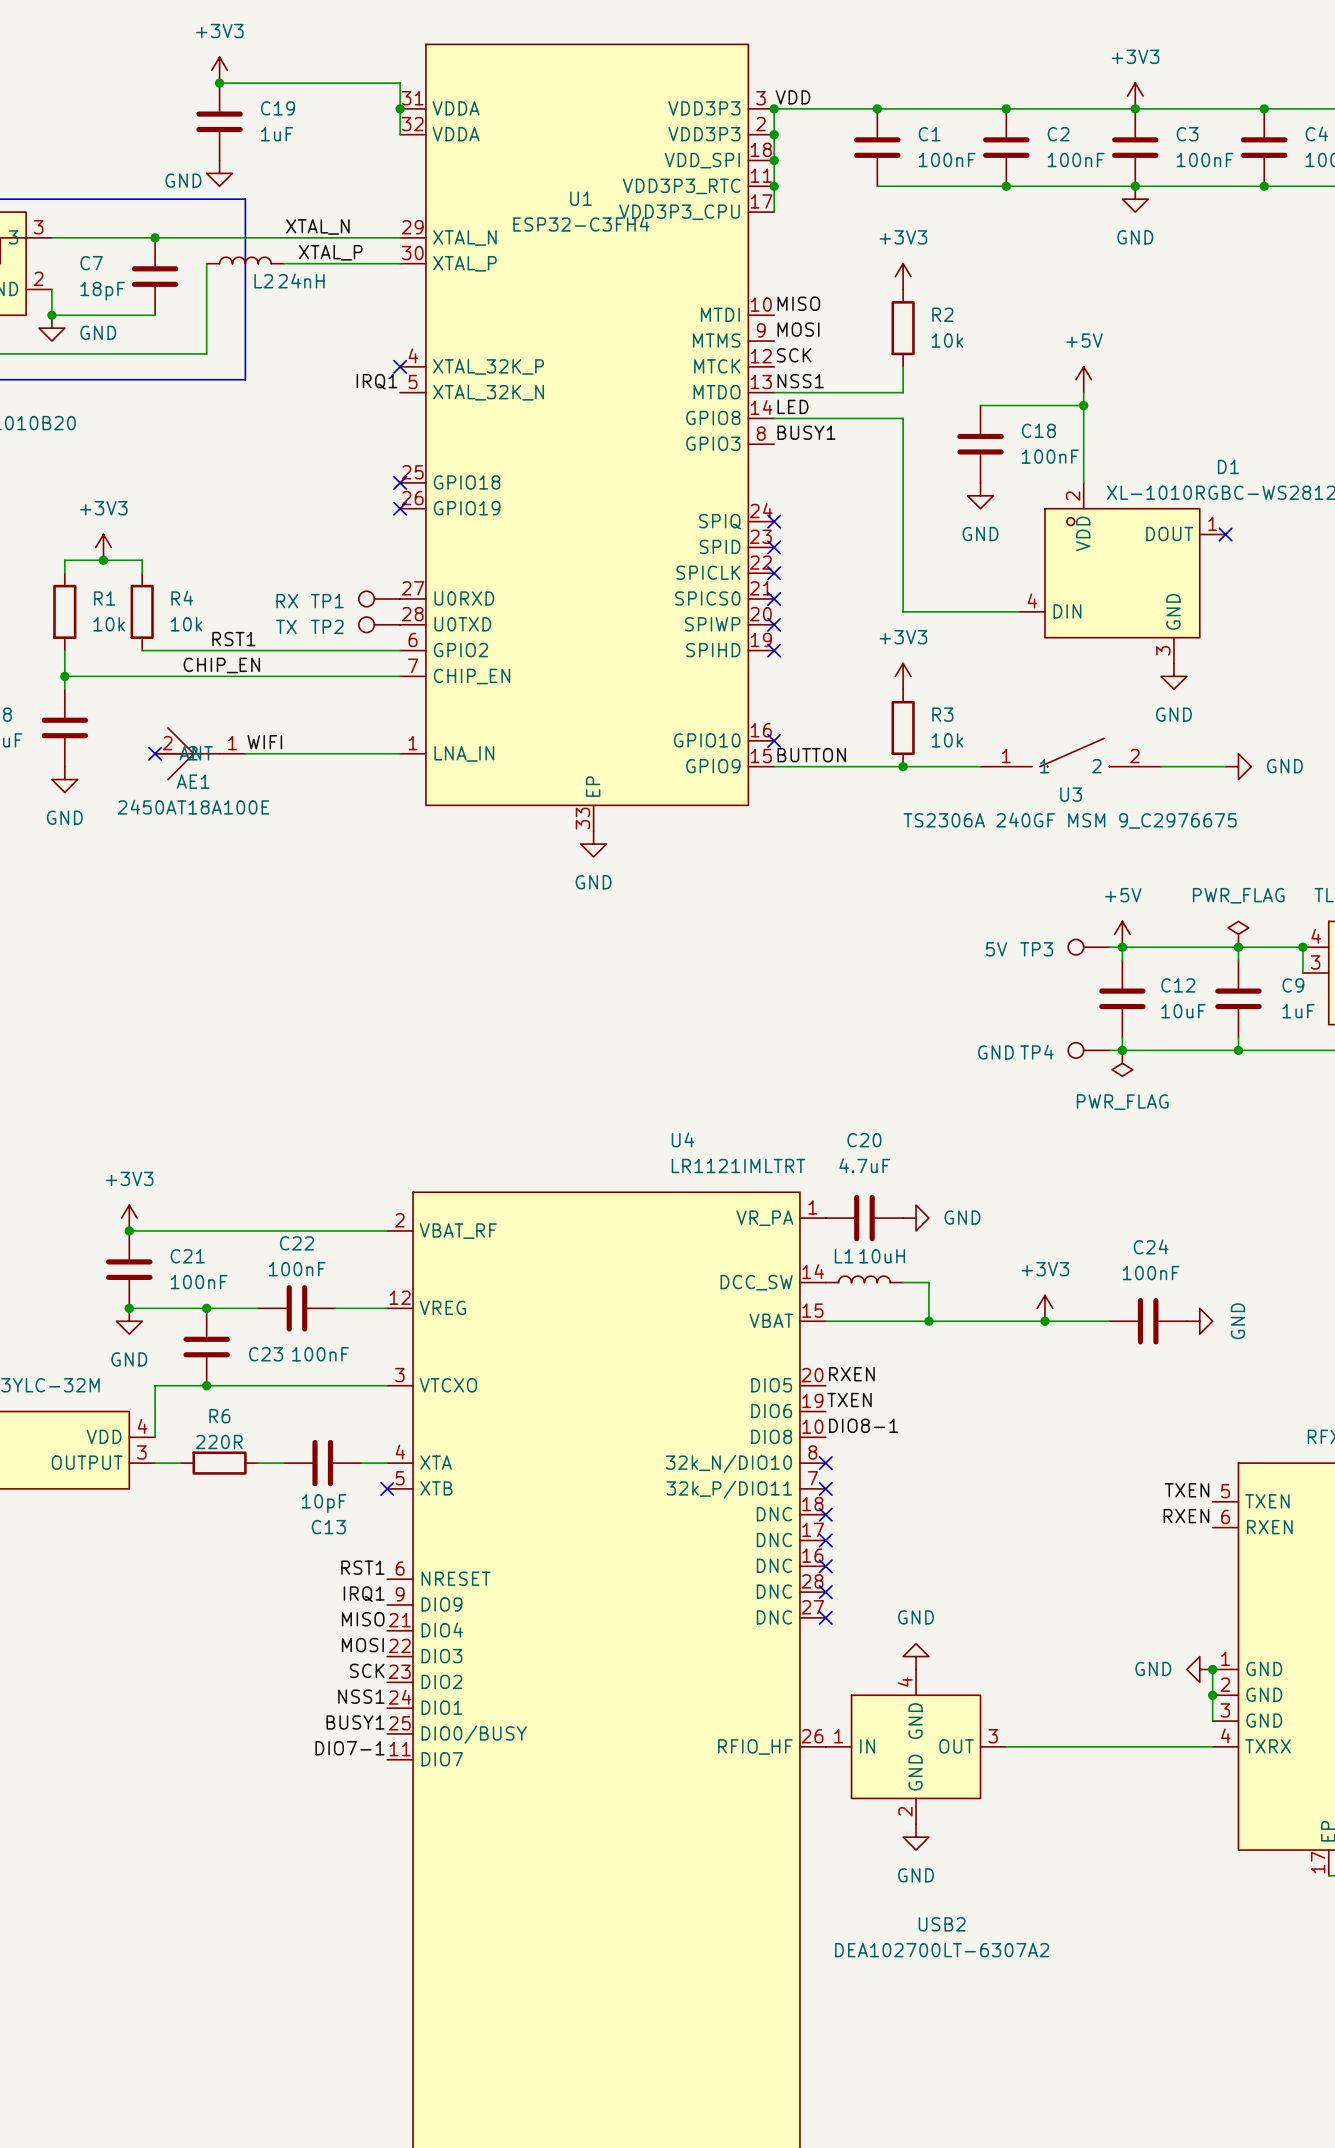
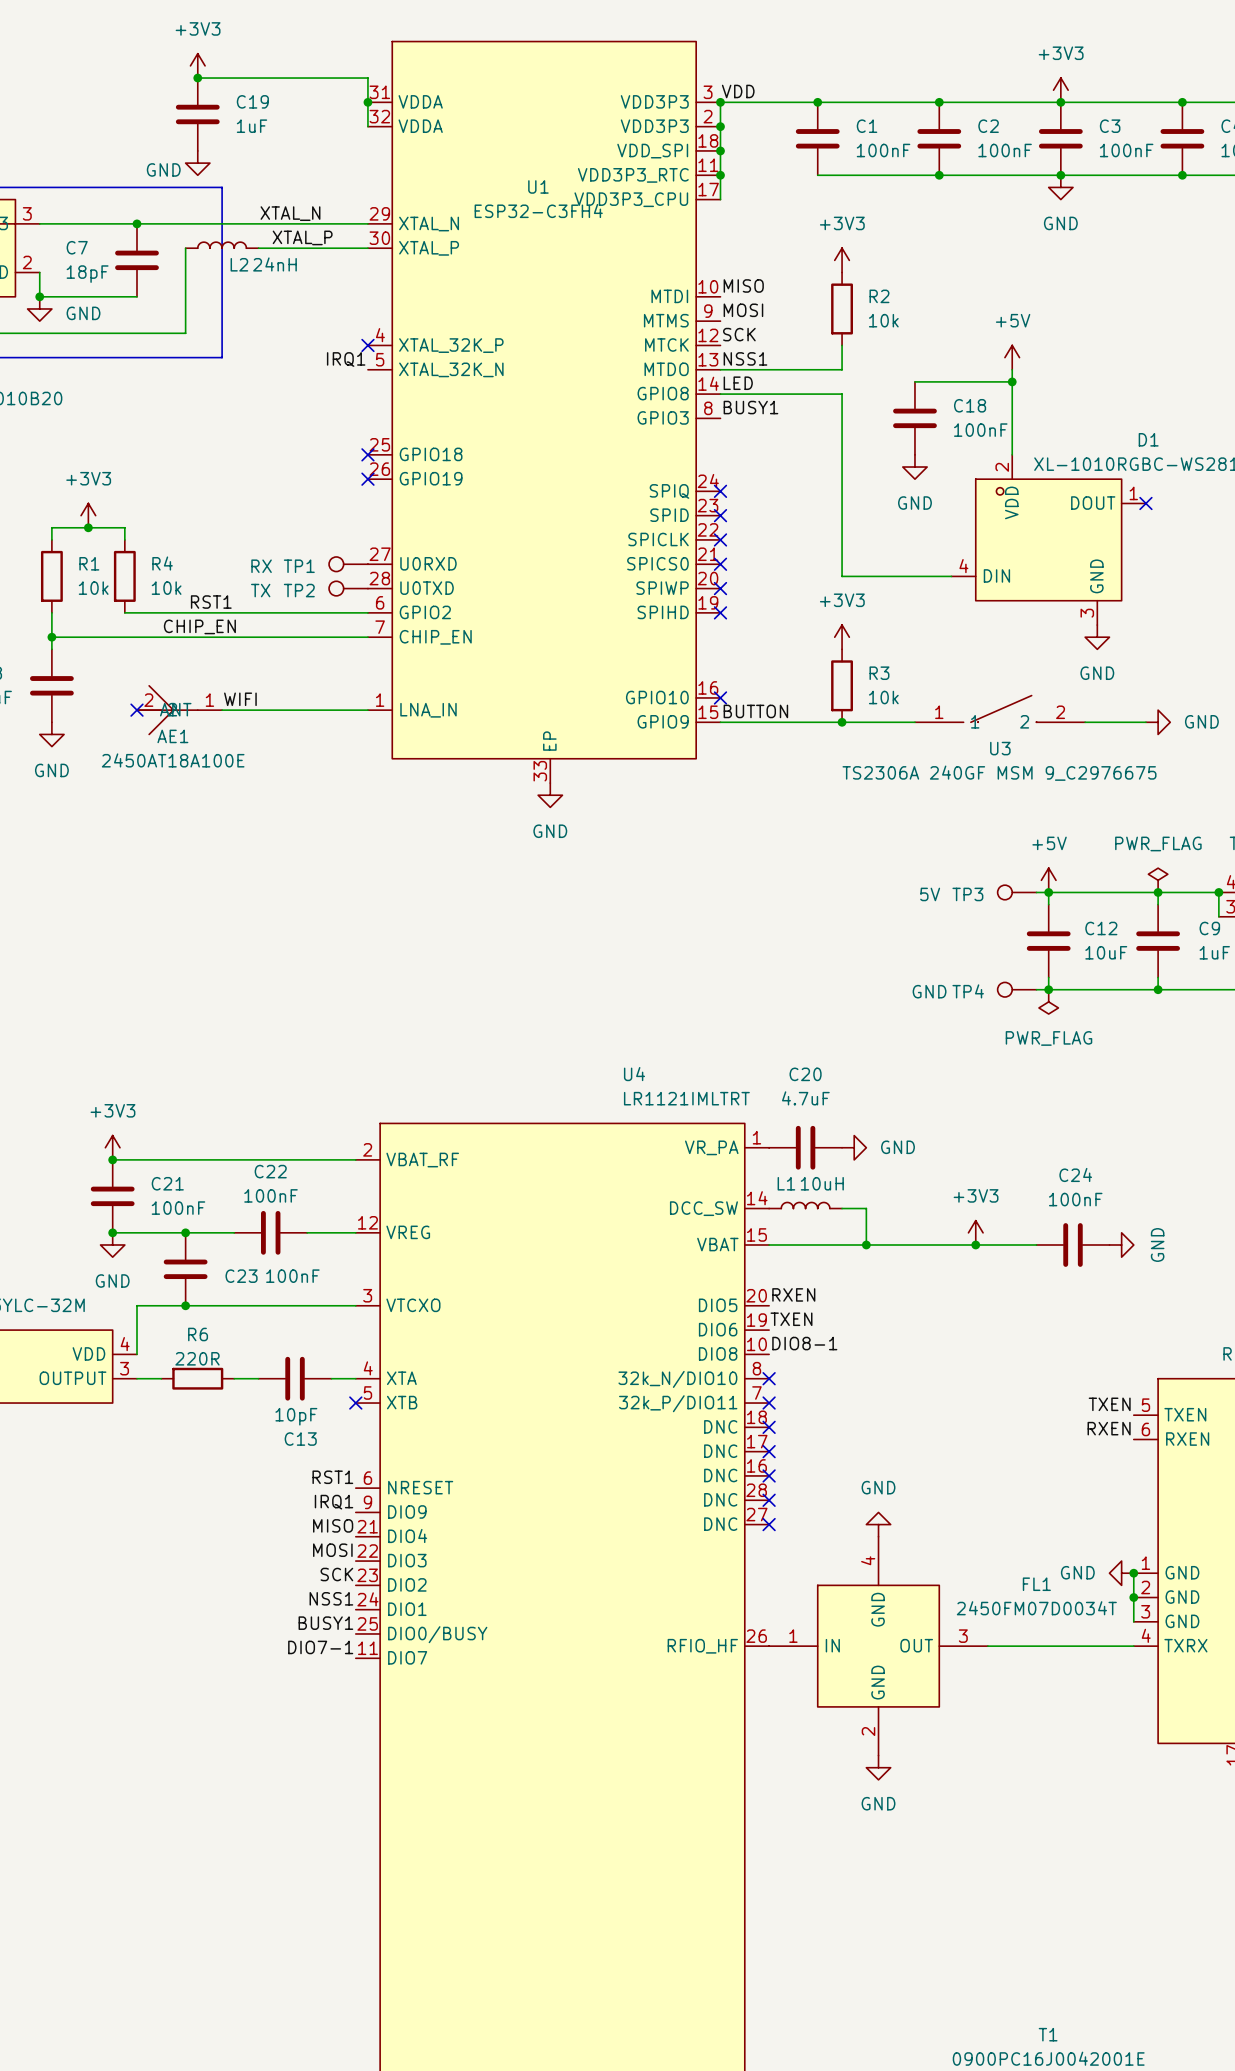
power symbol position: GND (916, 1656) -> GND (878, 1524)
USB2: DEA102700LT-6307A2 (916, 1746) -> none
FL1: none -> 2450FM07D0034T (878, 1646)
power symbol position: GND (916, 1837) -> GND (878, 1767)

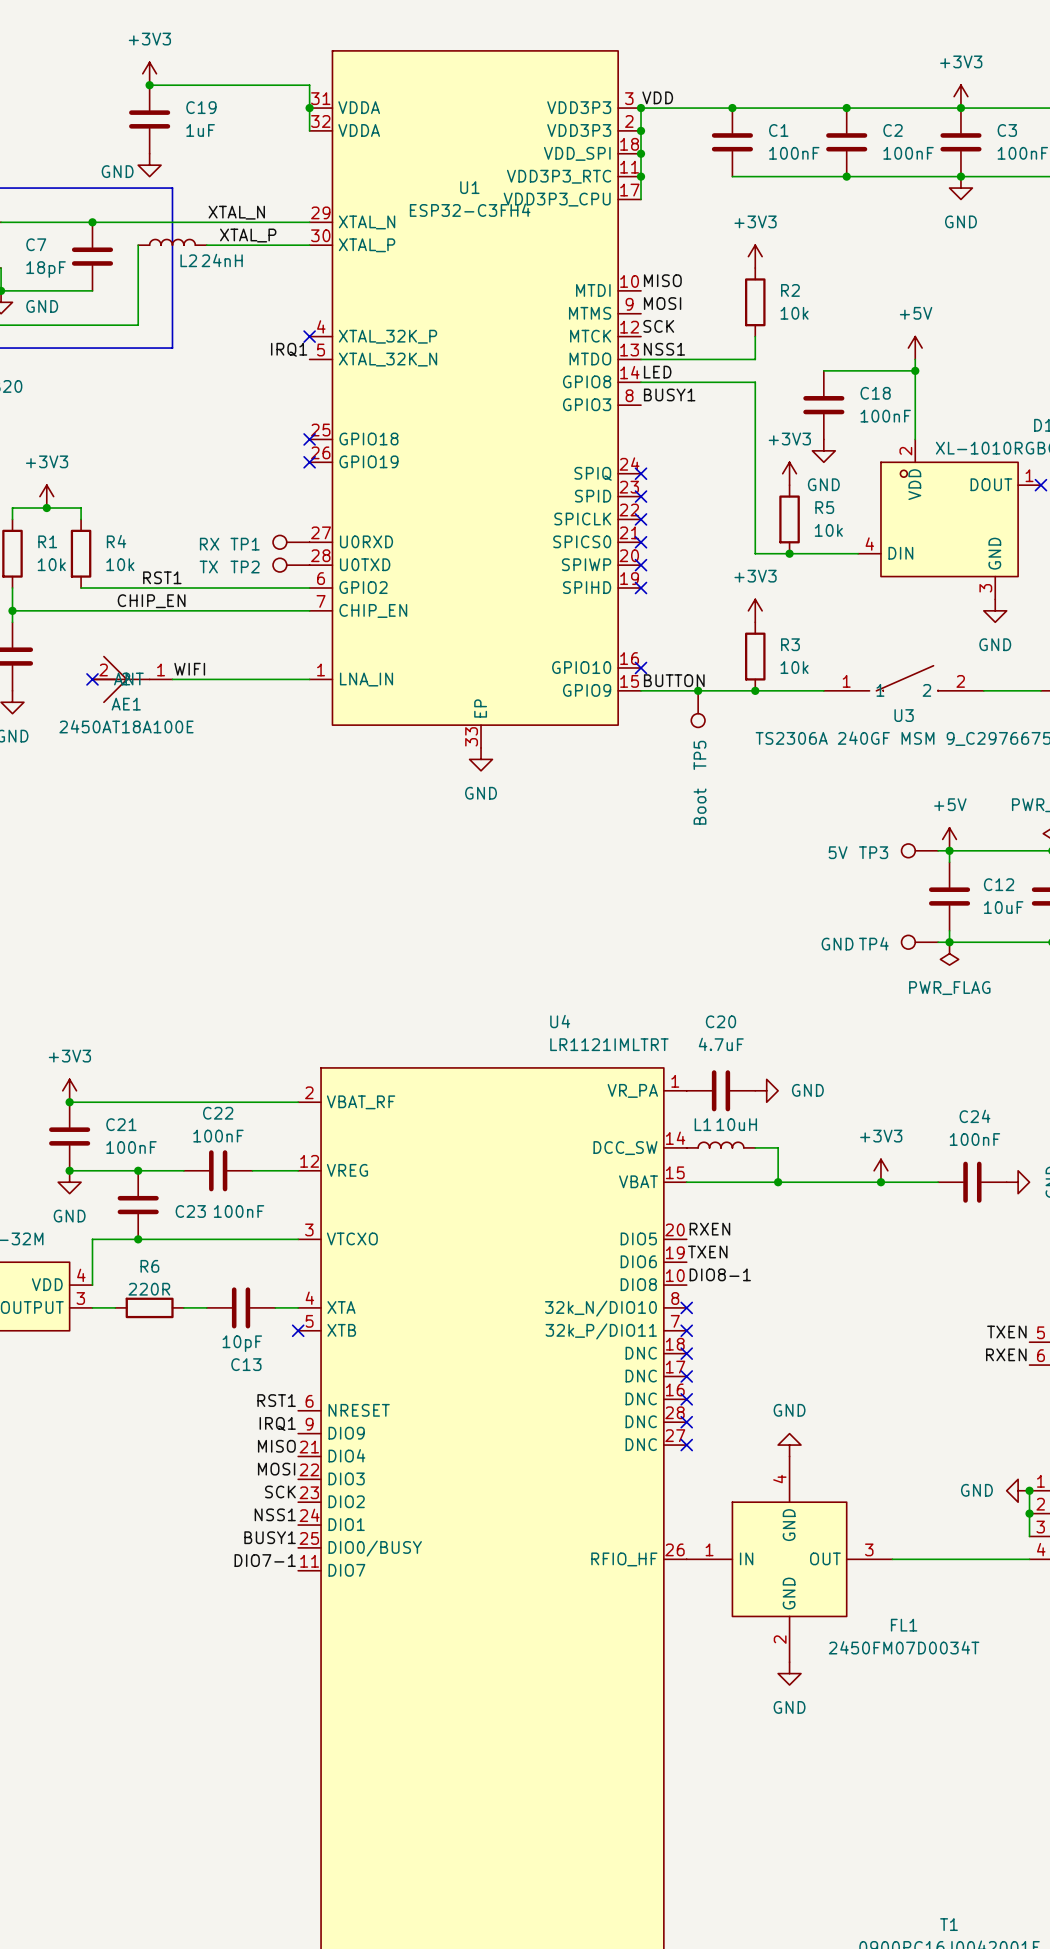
power symbol: none -> +3V3 (789, 473)
R5: none -> 10k (789, 519)
junction: none -> (789, 553)
junction: none -> (698, 690)
TP5: none -> Boot (698, 709)
FL1 name position: FL1 (1036, 1584) -> FL1 (904, 1625)
FL1 value position: 2450FM07D0034T (1036, 1608) -> 2450FM07D0034T (904, 1647)

